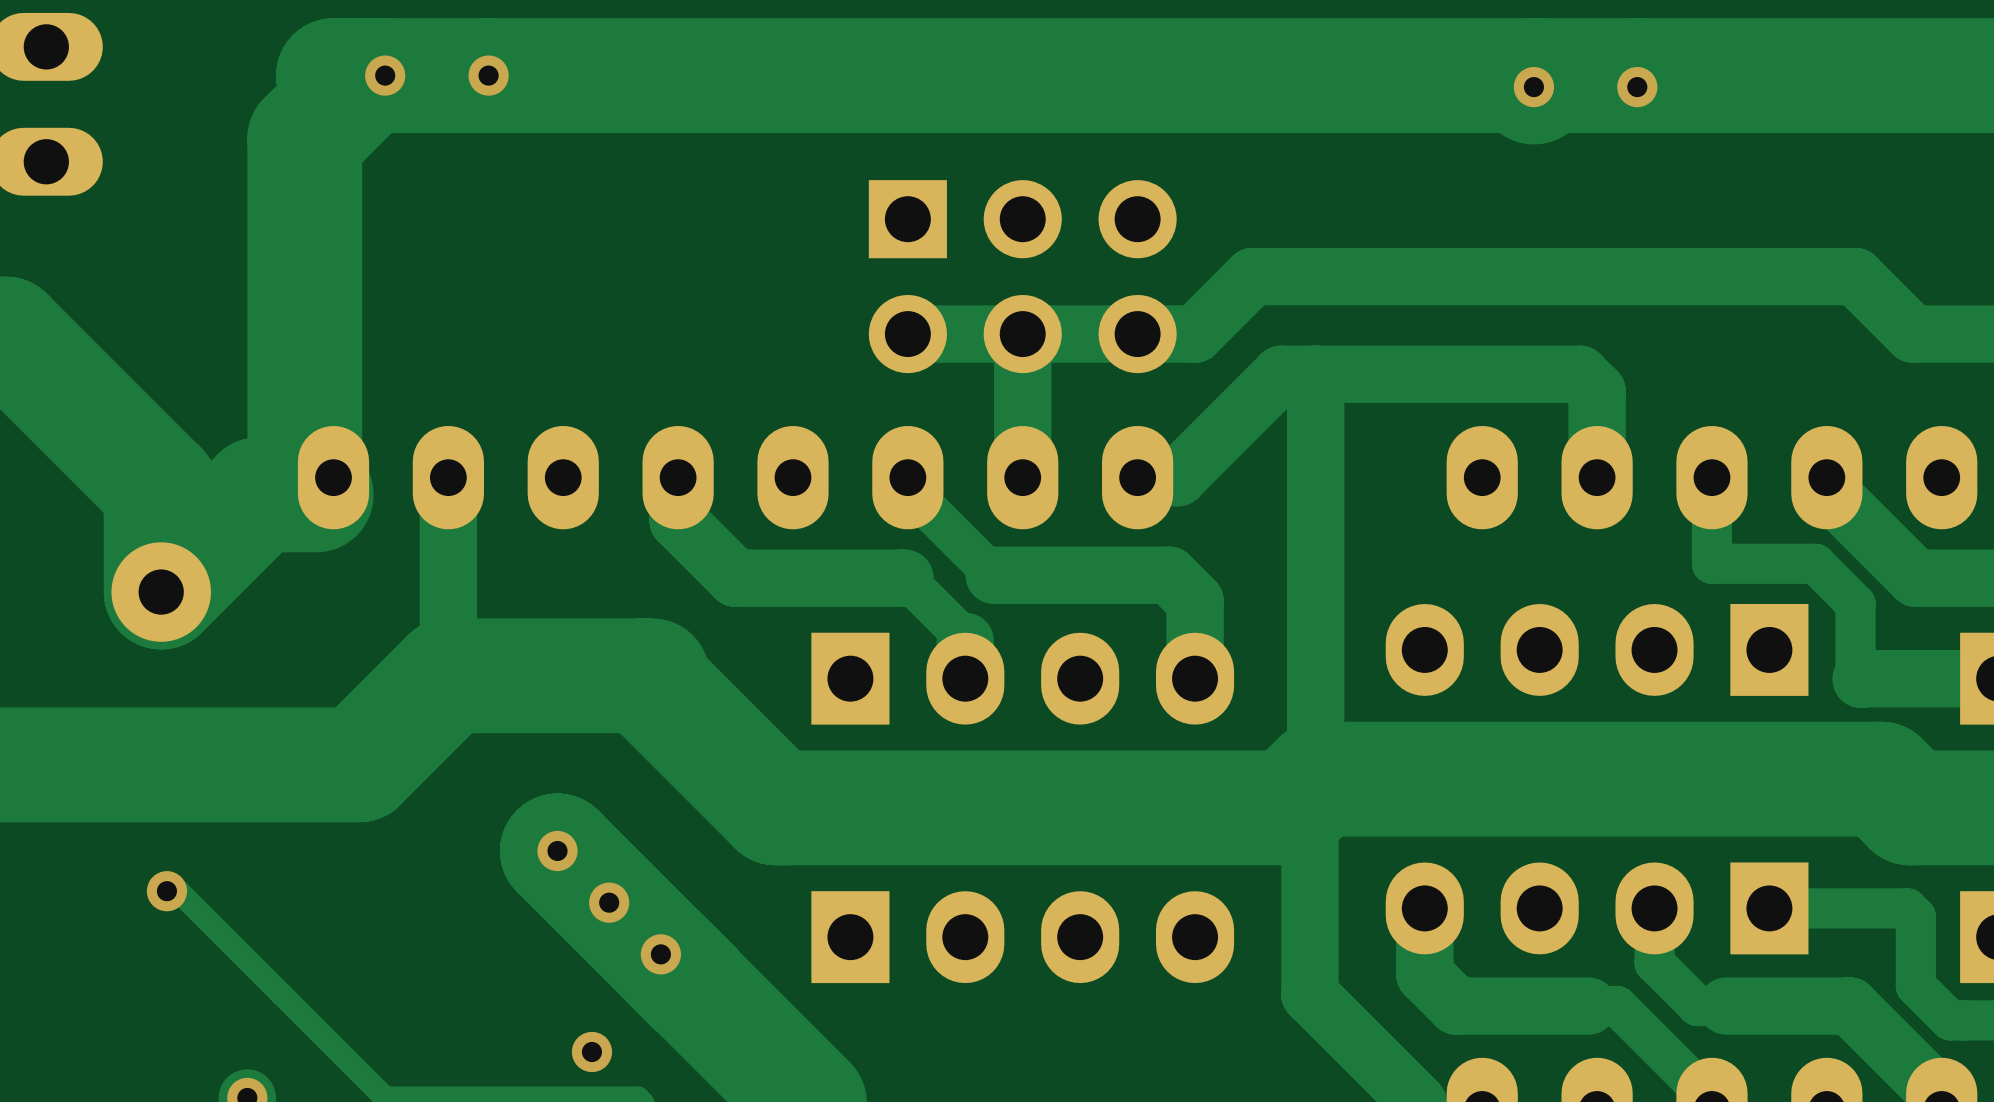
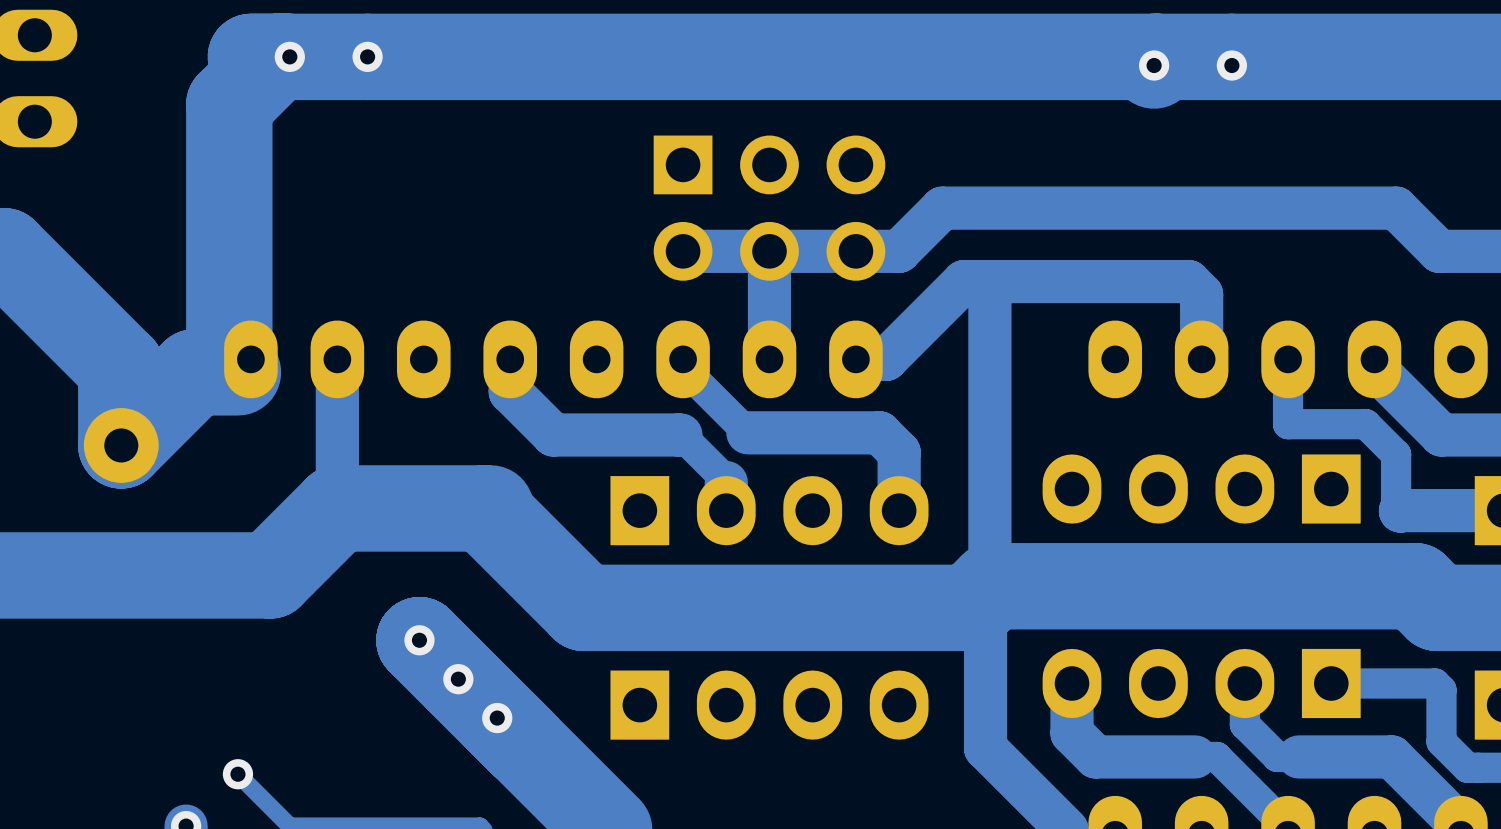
track: (166, 891) (178, 891) (316, 1029) -> none
via: (166, 891) -> none
via: none -> (237, 774)
via: (591, 1052) -> none

